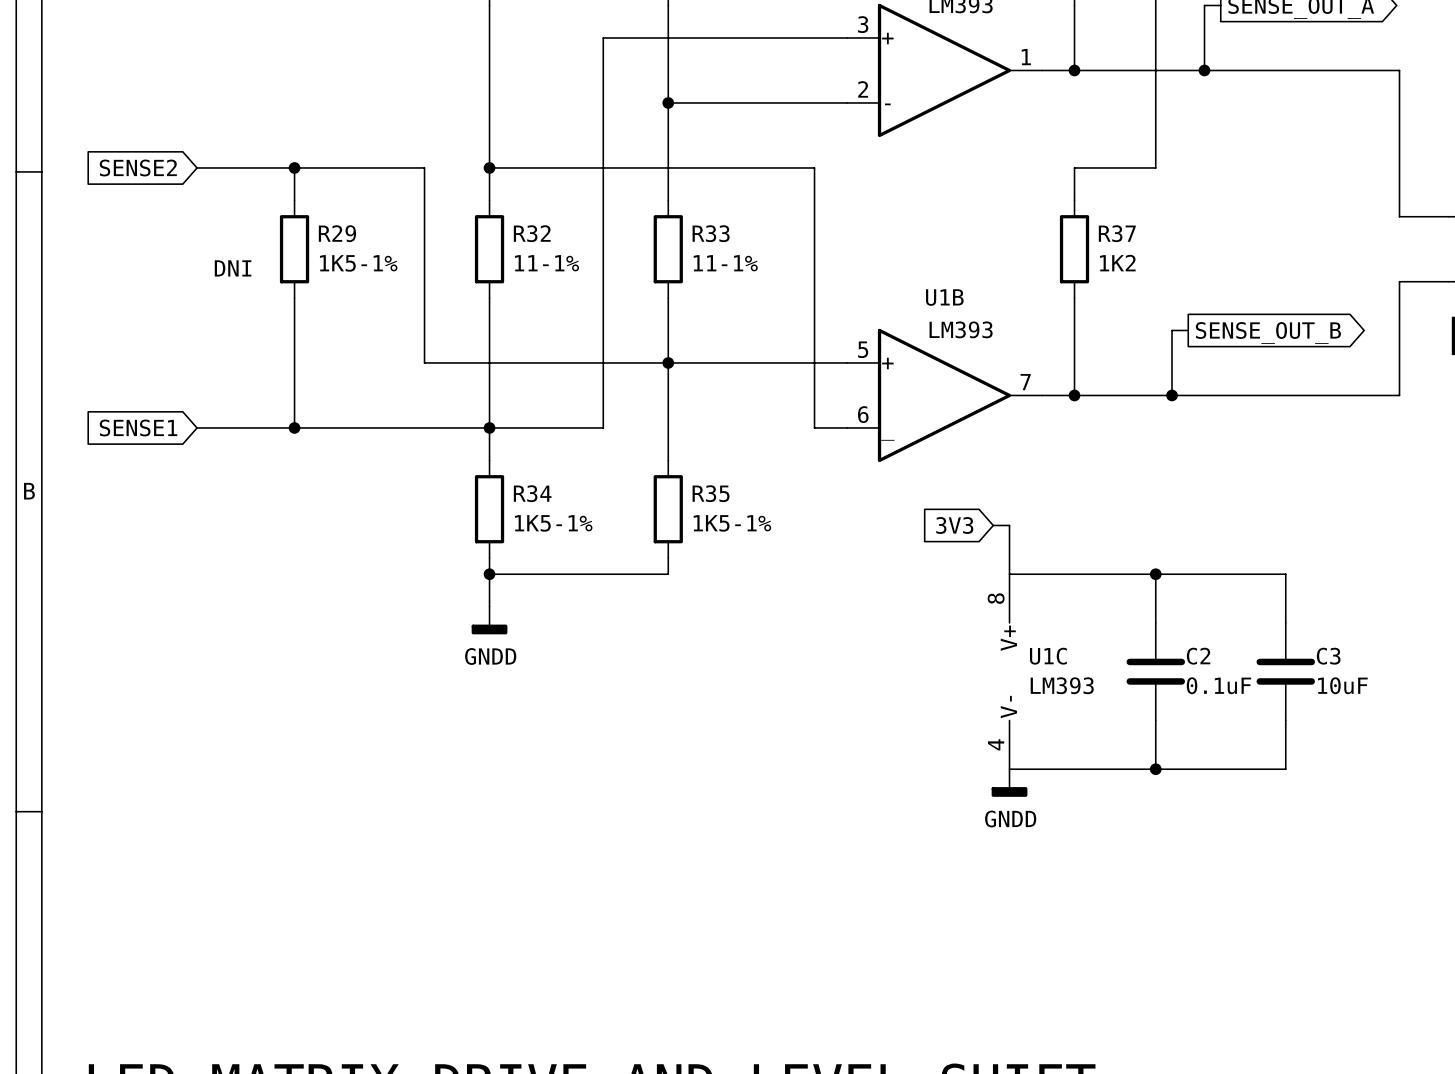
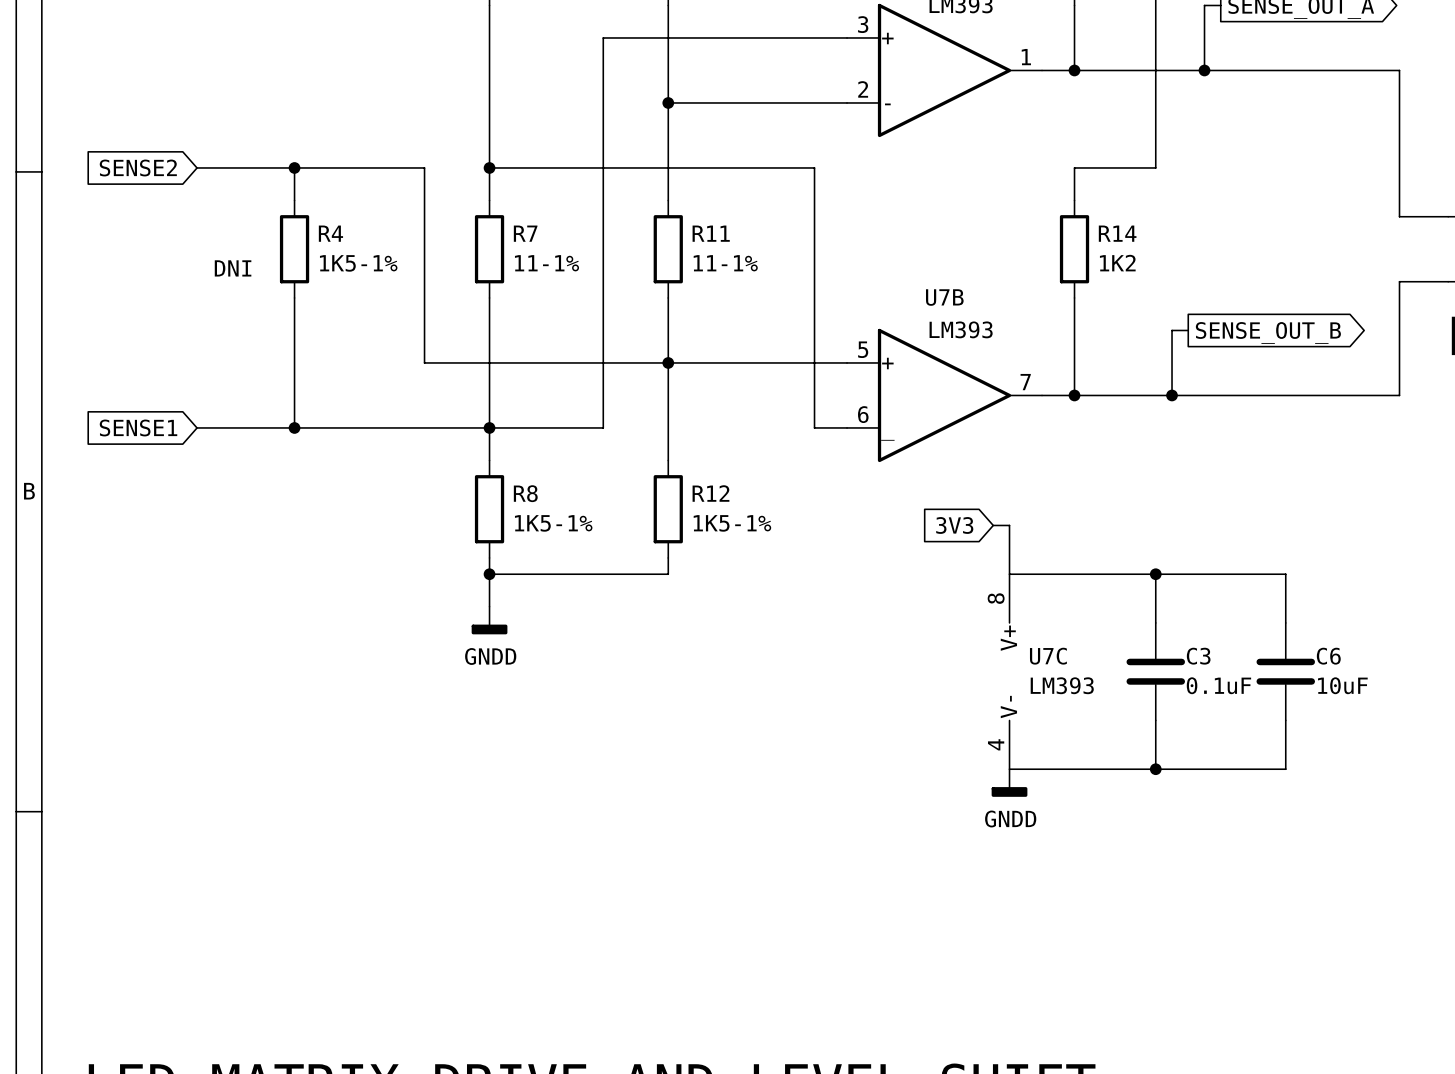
R29 name: R29 (337, 233) -> R4 (330, 233)
R32 name: R32 (532, 233) -> R7 (525, 233)
R33 name: R33 (711, 233) -> R11 (711, 233)
R37 name: R37 (1117, 233) -> R14 (1117, 233)
U1B name: U1B (944, 297) -> U7B (944, 297)
R34 name: R34 (532, 493) -> R8 (525, 493)
R35 name: R35 (711, 493) -> R12 (710, 493)
U1C name: U1C (1048, 656) -> U7C (1048, 656)
C2 name: C2 (1198, 656) -> C3 (1198, 656)
C3 name: C3 (1328, 656) -> C6 (1328, 656)

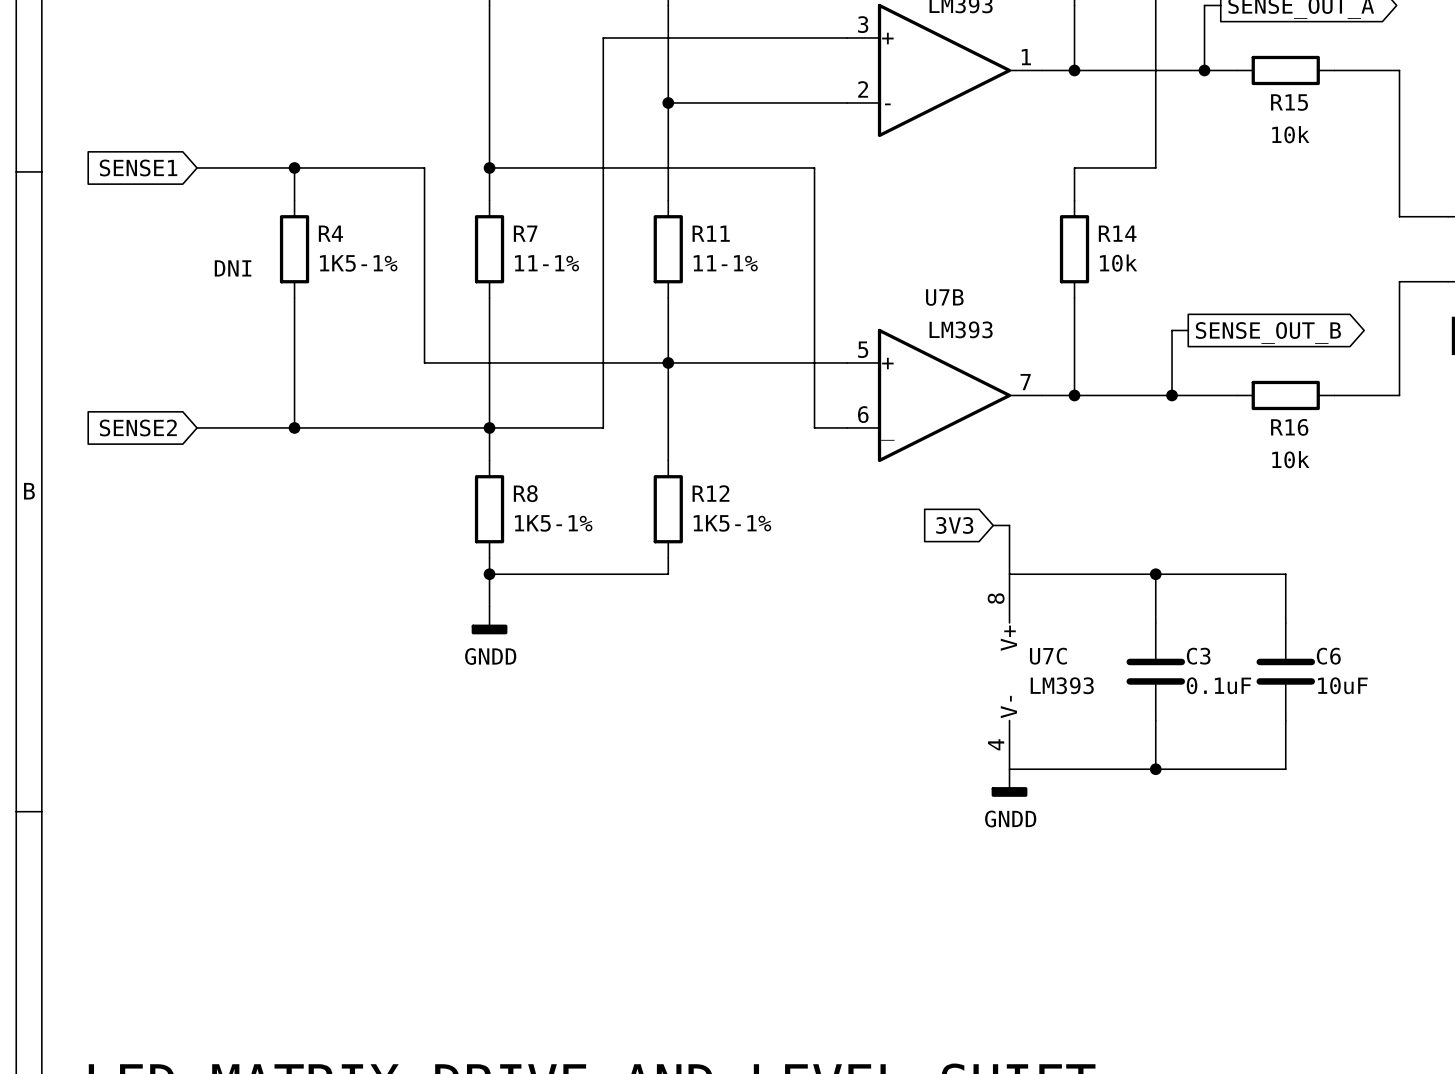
wire: (1237, 70) (1334, 70) -> none
R15: none -> 10k (1285, 70)
global label: SENSE2 (138, 167) -> SENSE1 (138, 167)
R14 value: 1K2 (1117, 263) -> 10k (1118, 263)
wire: (1237, 395) (1334, 395) -> none
R16: none -> 10k (1285, 395)
global label: SENSE1 (138, 427) -> SENSE2 (138, 427)

